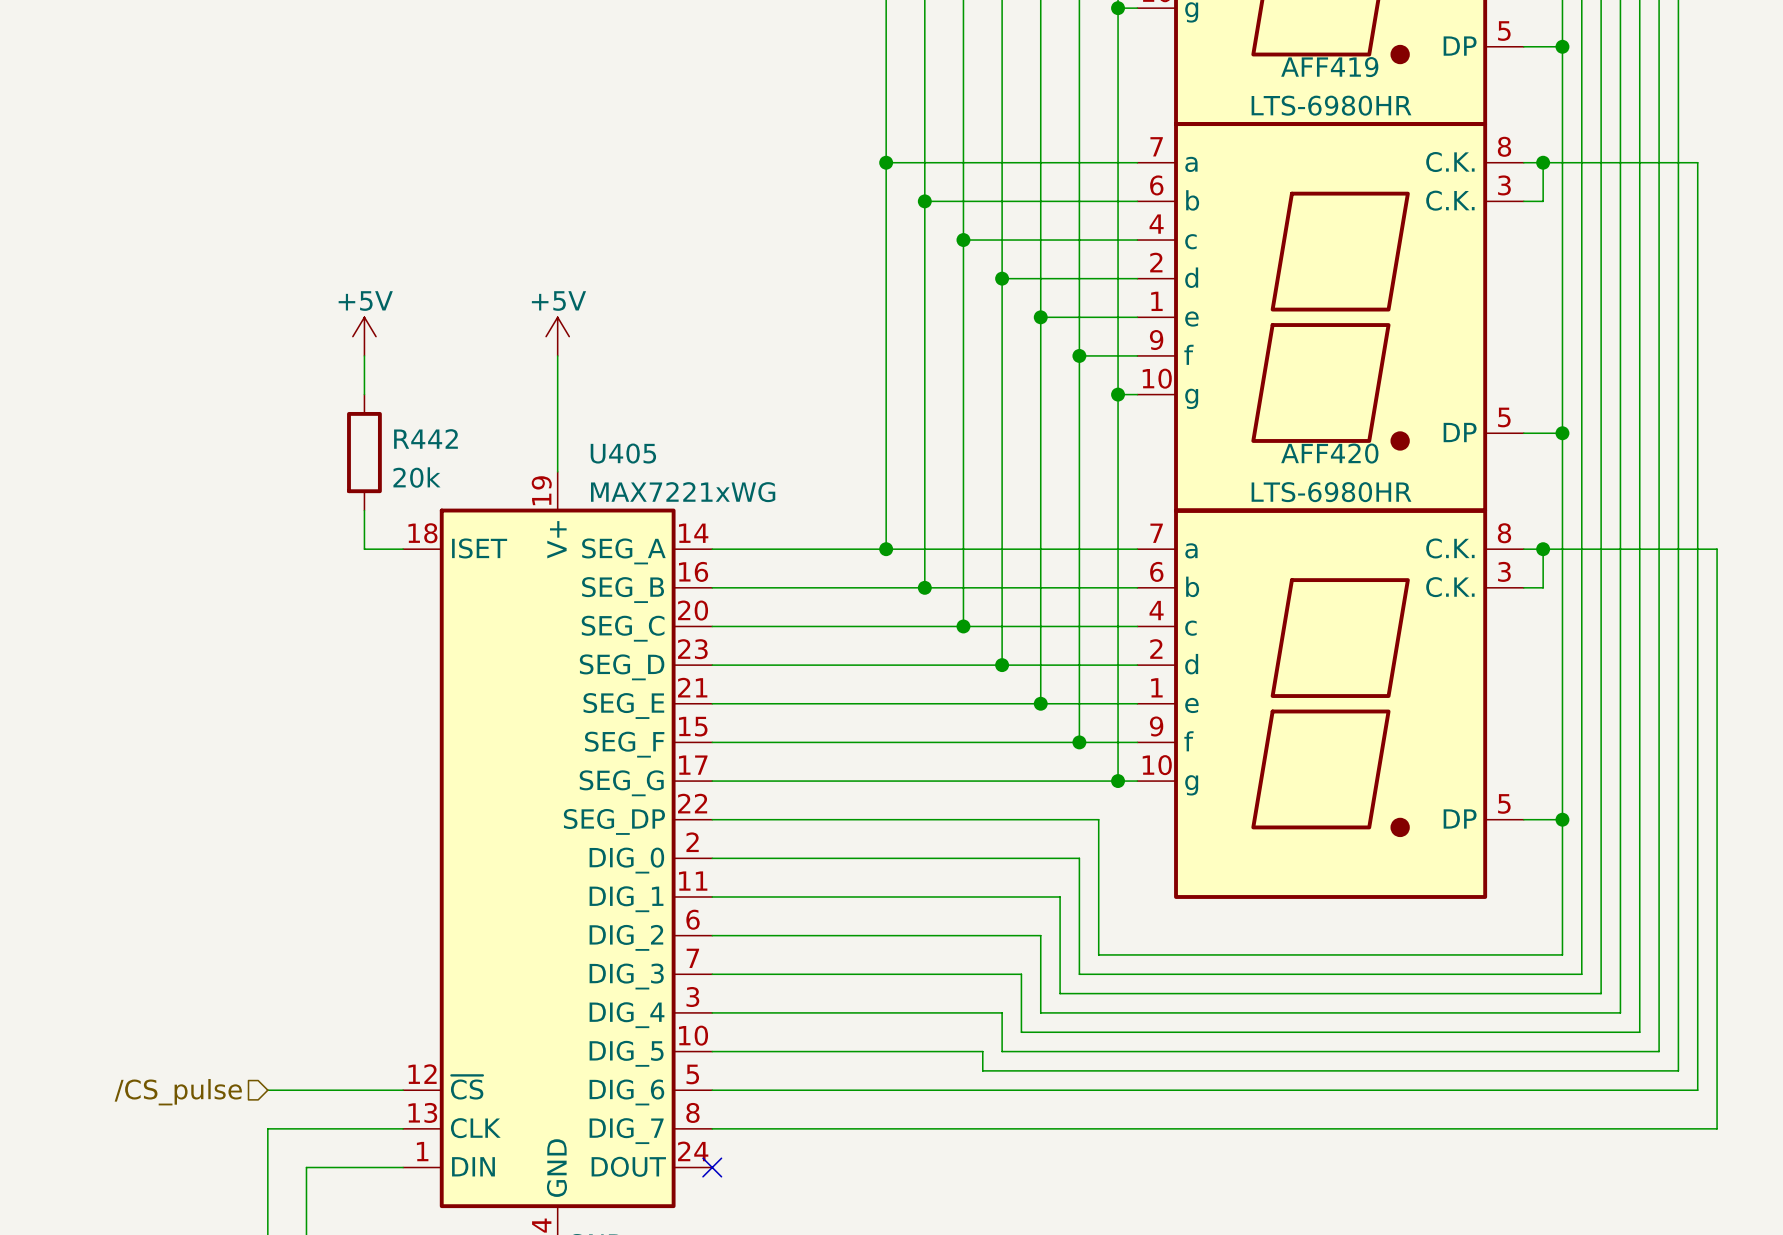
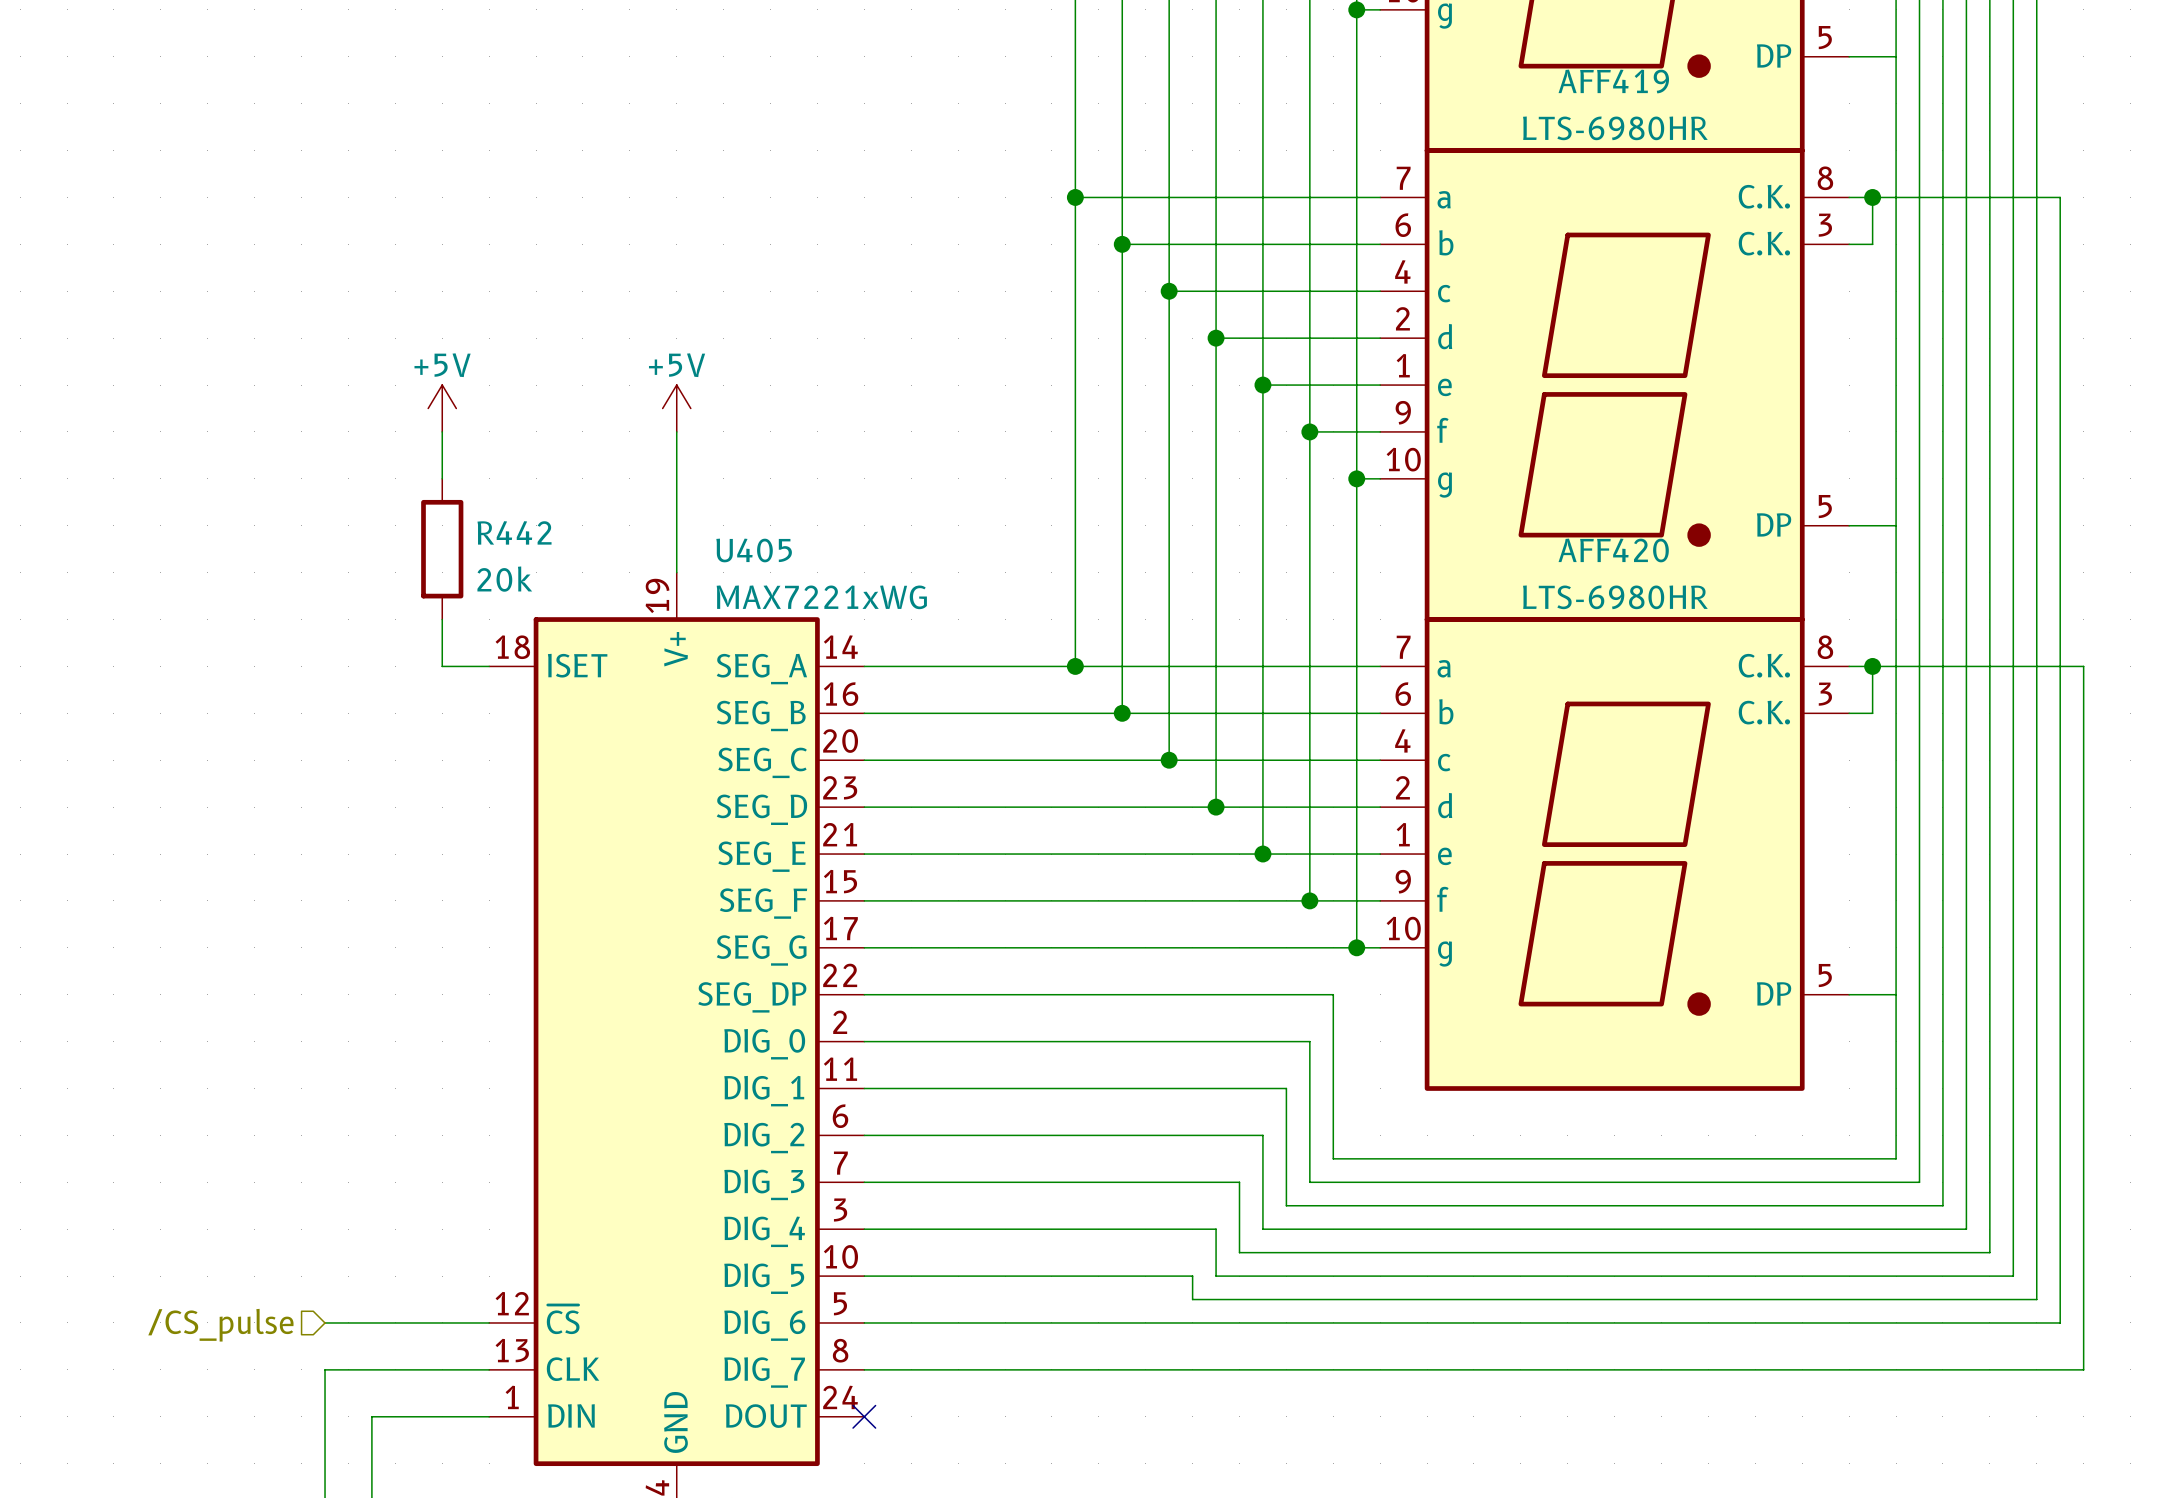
junction: (1562, 46) -> none
junction: (1562, 433) -> none
junction: (1562, 819) -> none

